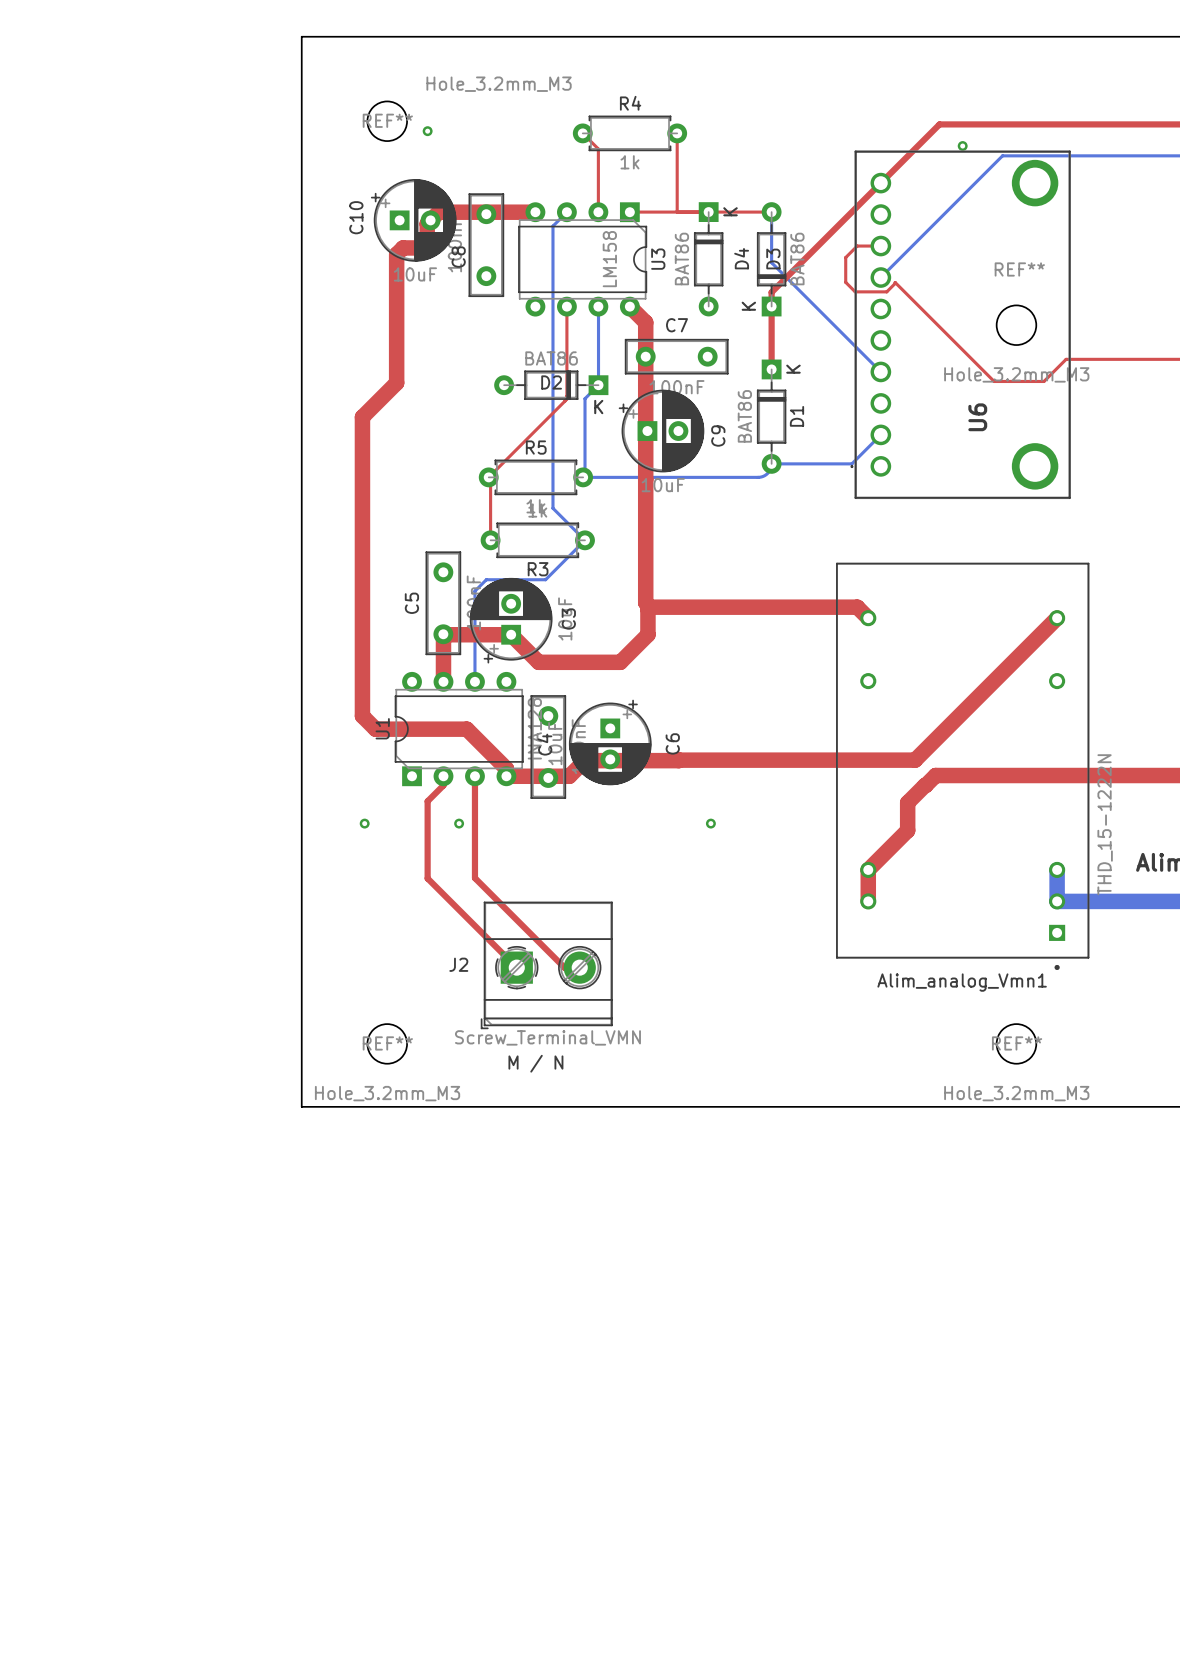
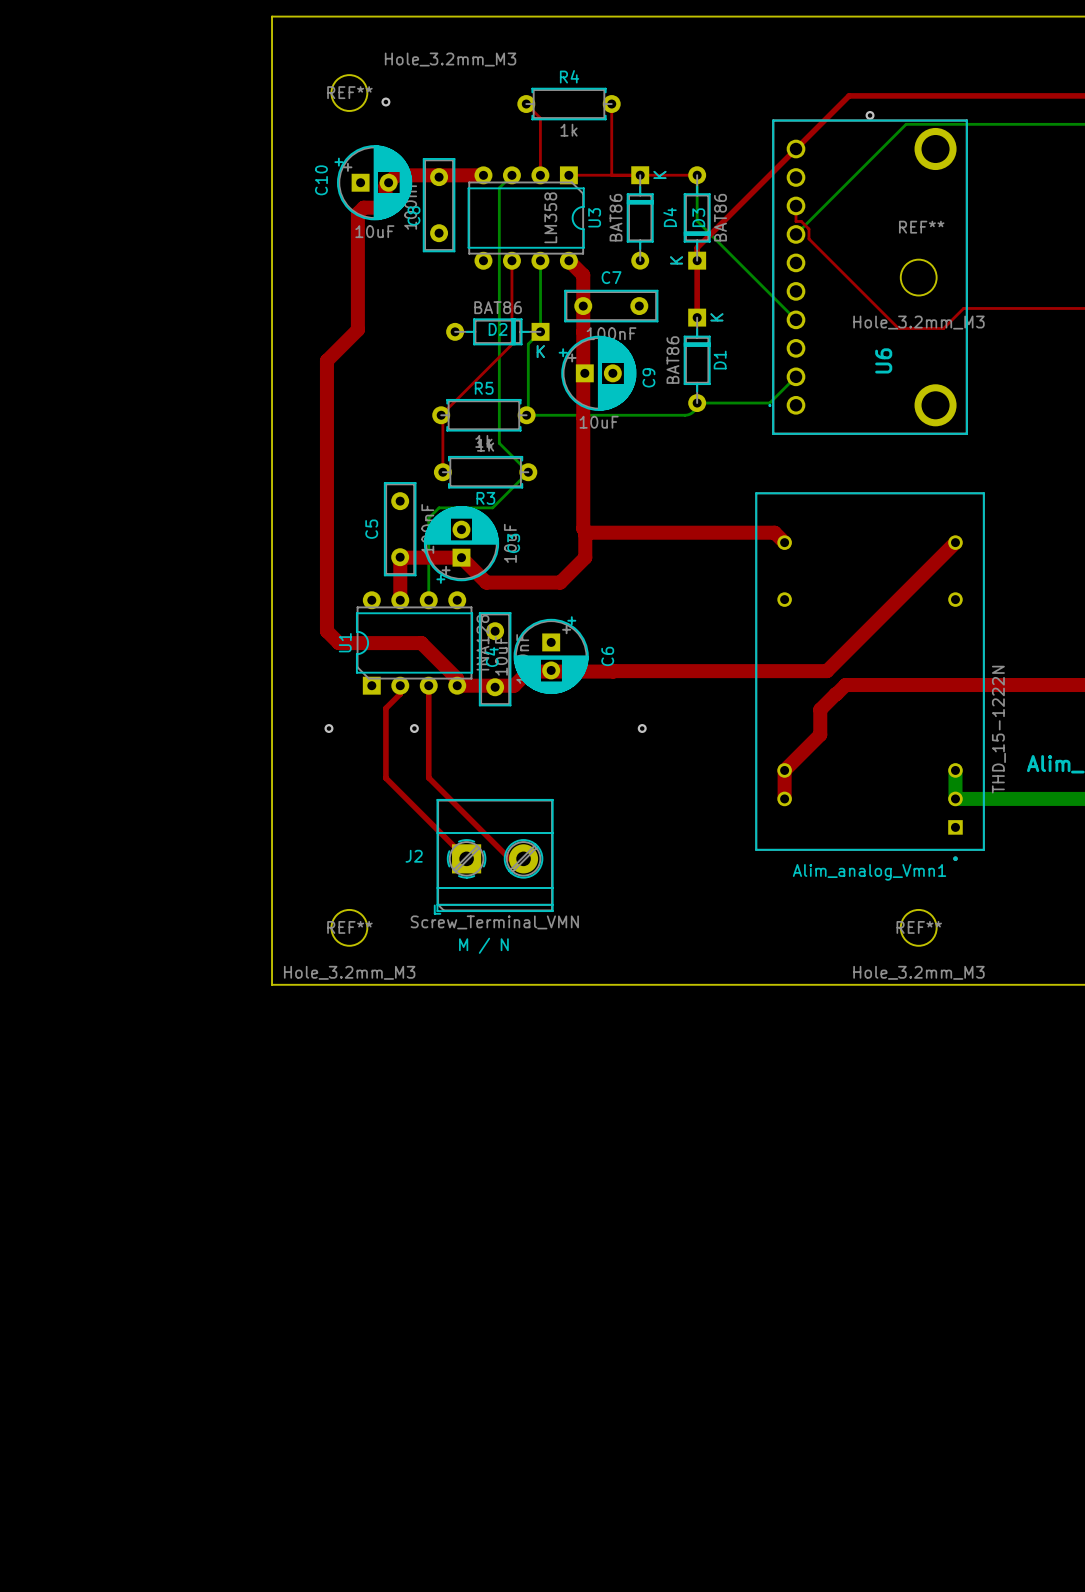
top track: (880, 246) (857, 246) (845, 257) (845, 282) (855, 291) (886, 291) (895, 282) -> (796, 205) (796, 221) (801, 221) (808, 229) (808, 238)
U3 value: LM158 (609, 259) -> LM358 (550, 217)

